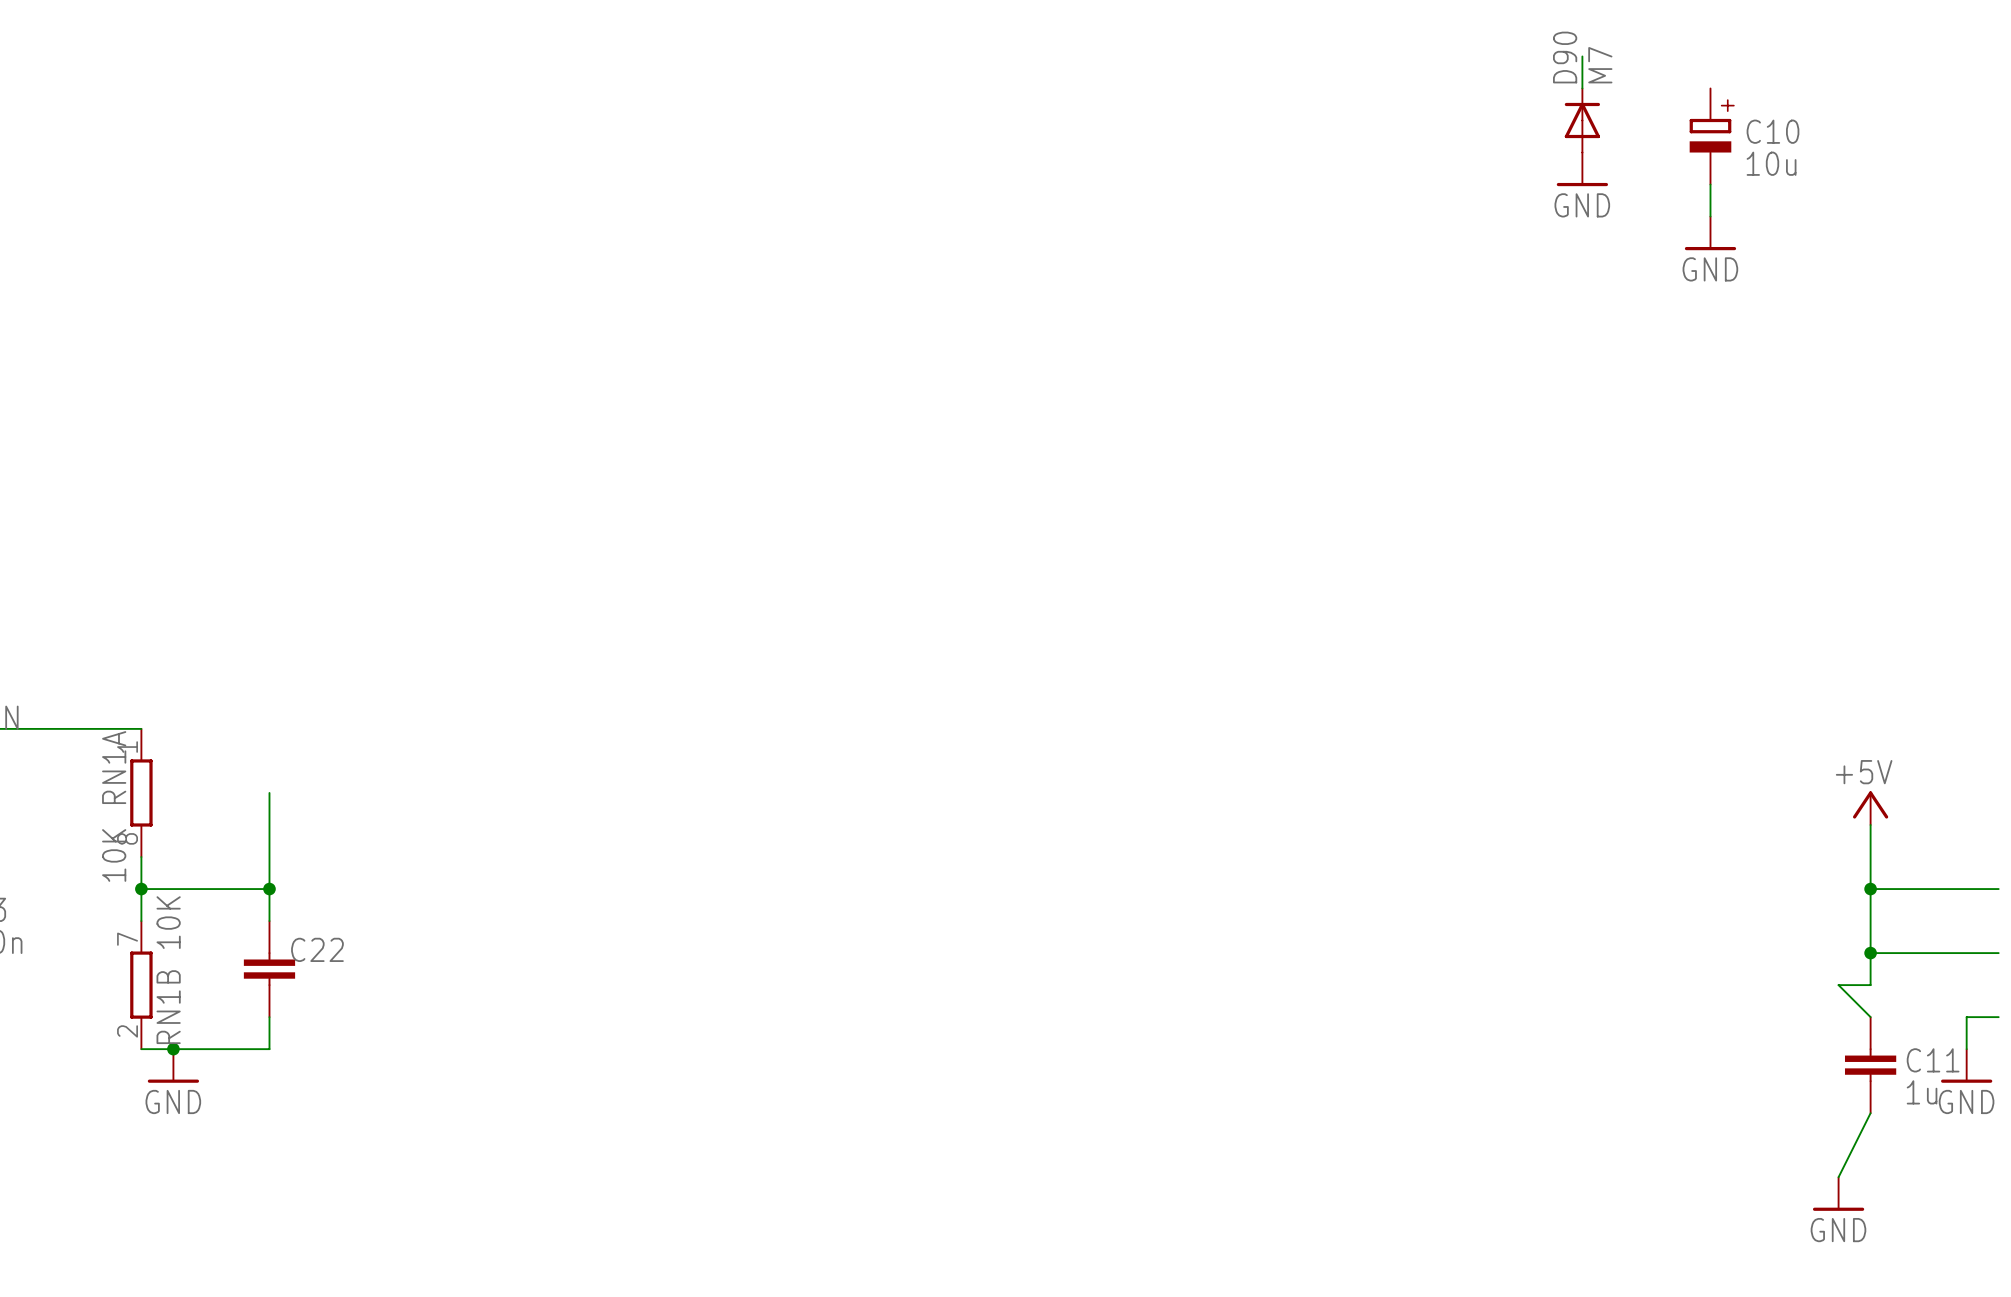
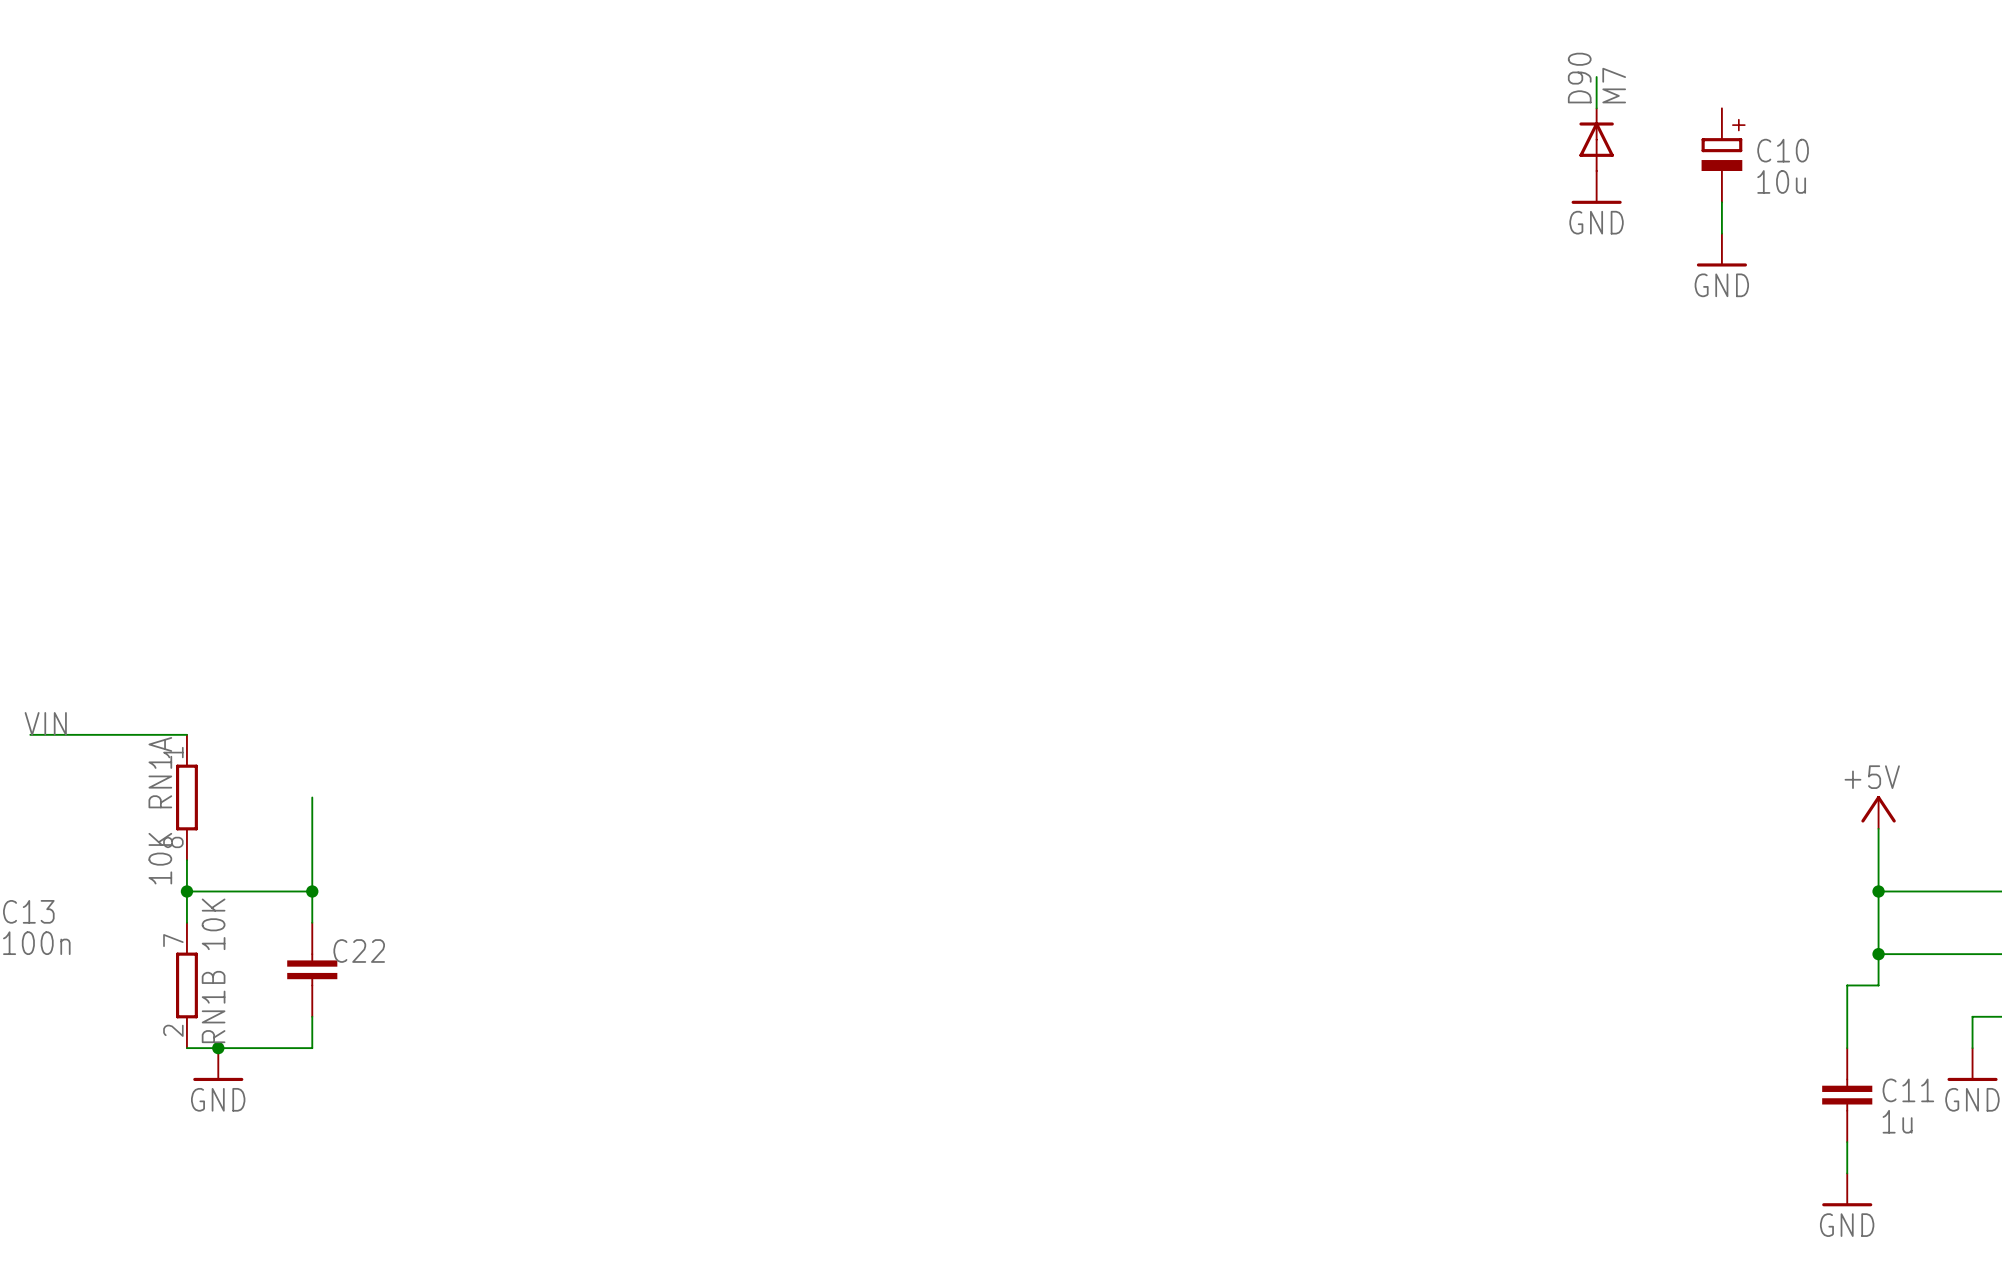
wire: (1838, 985) (1870, 1017) -> (1847, 985) (1847, 1048)
C11 position: (1870, 1065) -> (1847, 1095)
wire: (1870, 1113) (1838, 1177) -> (1847, 1142) (1847, 1173)

